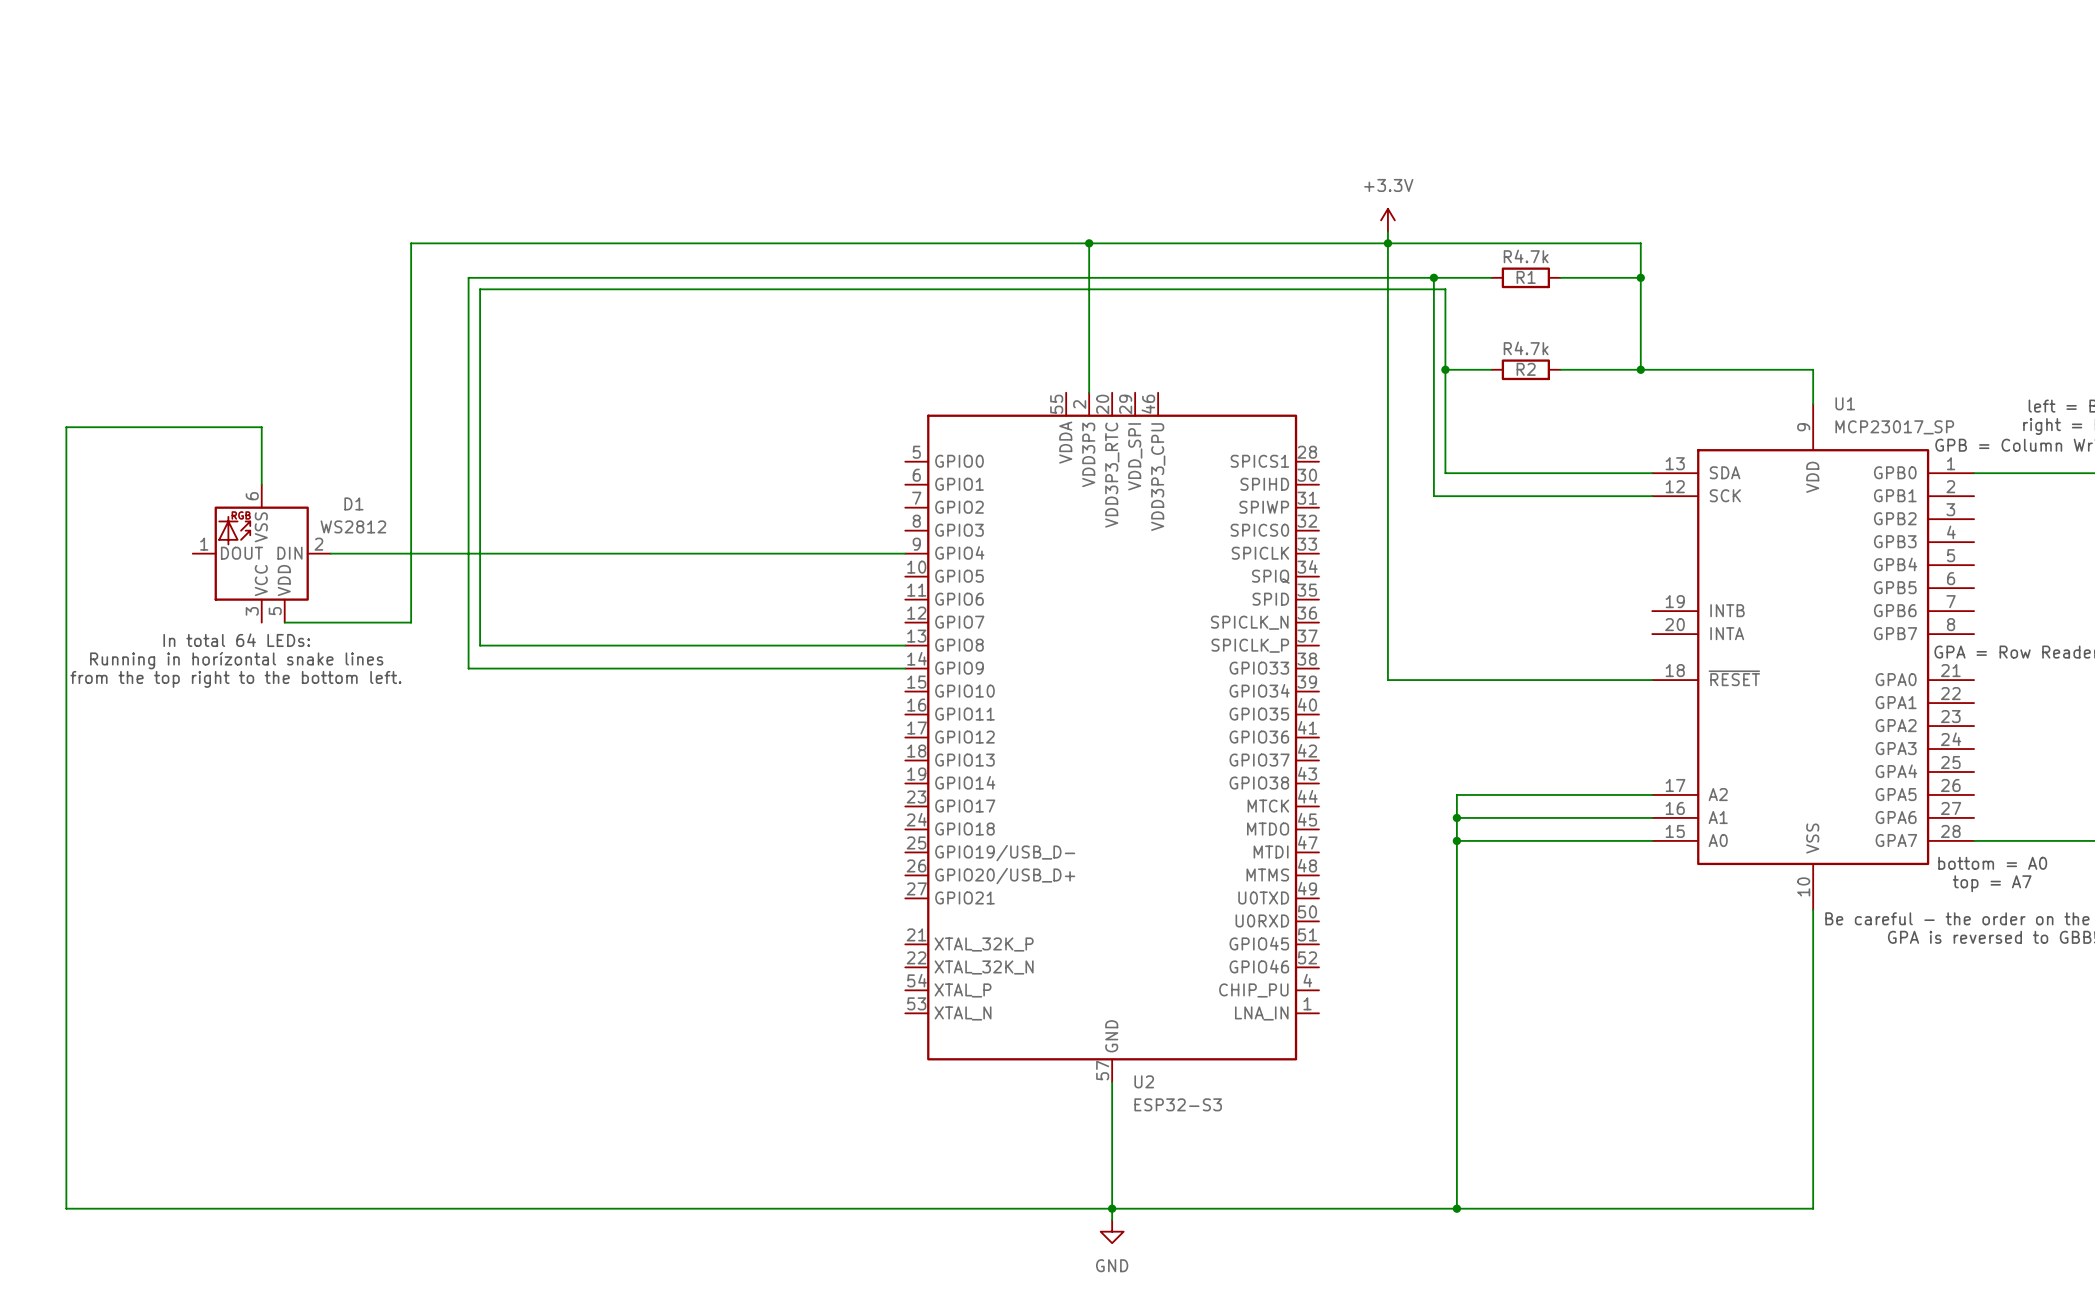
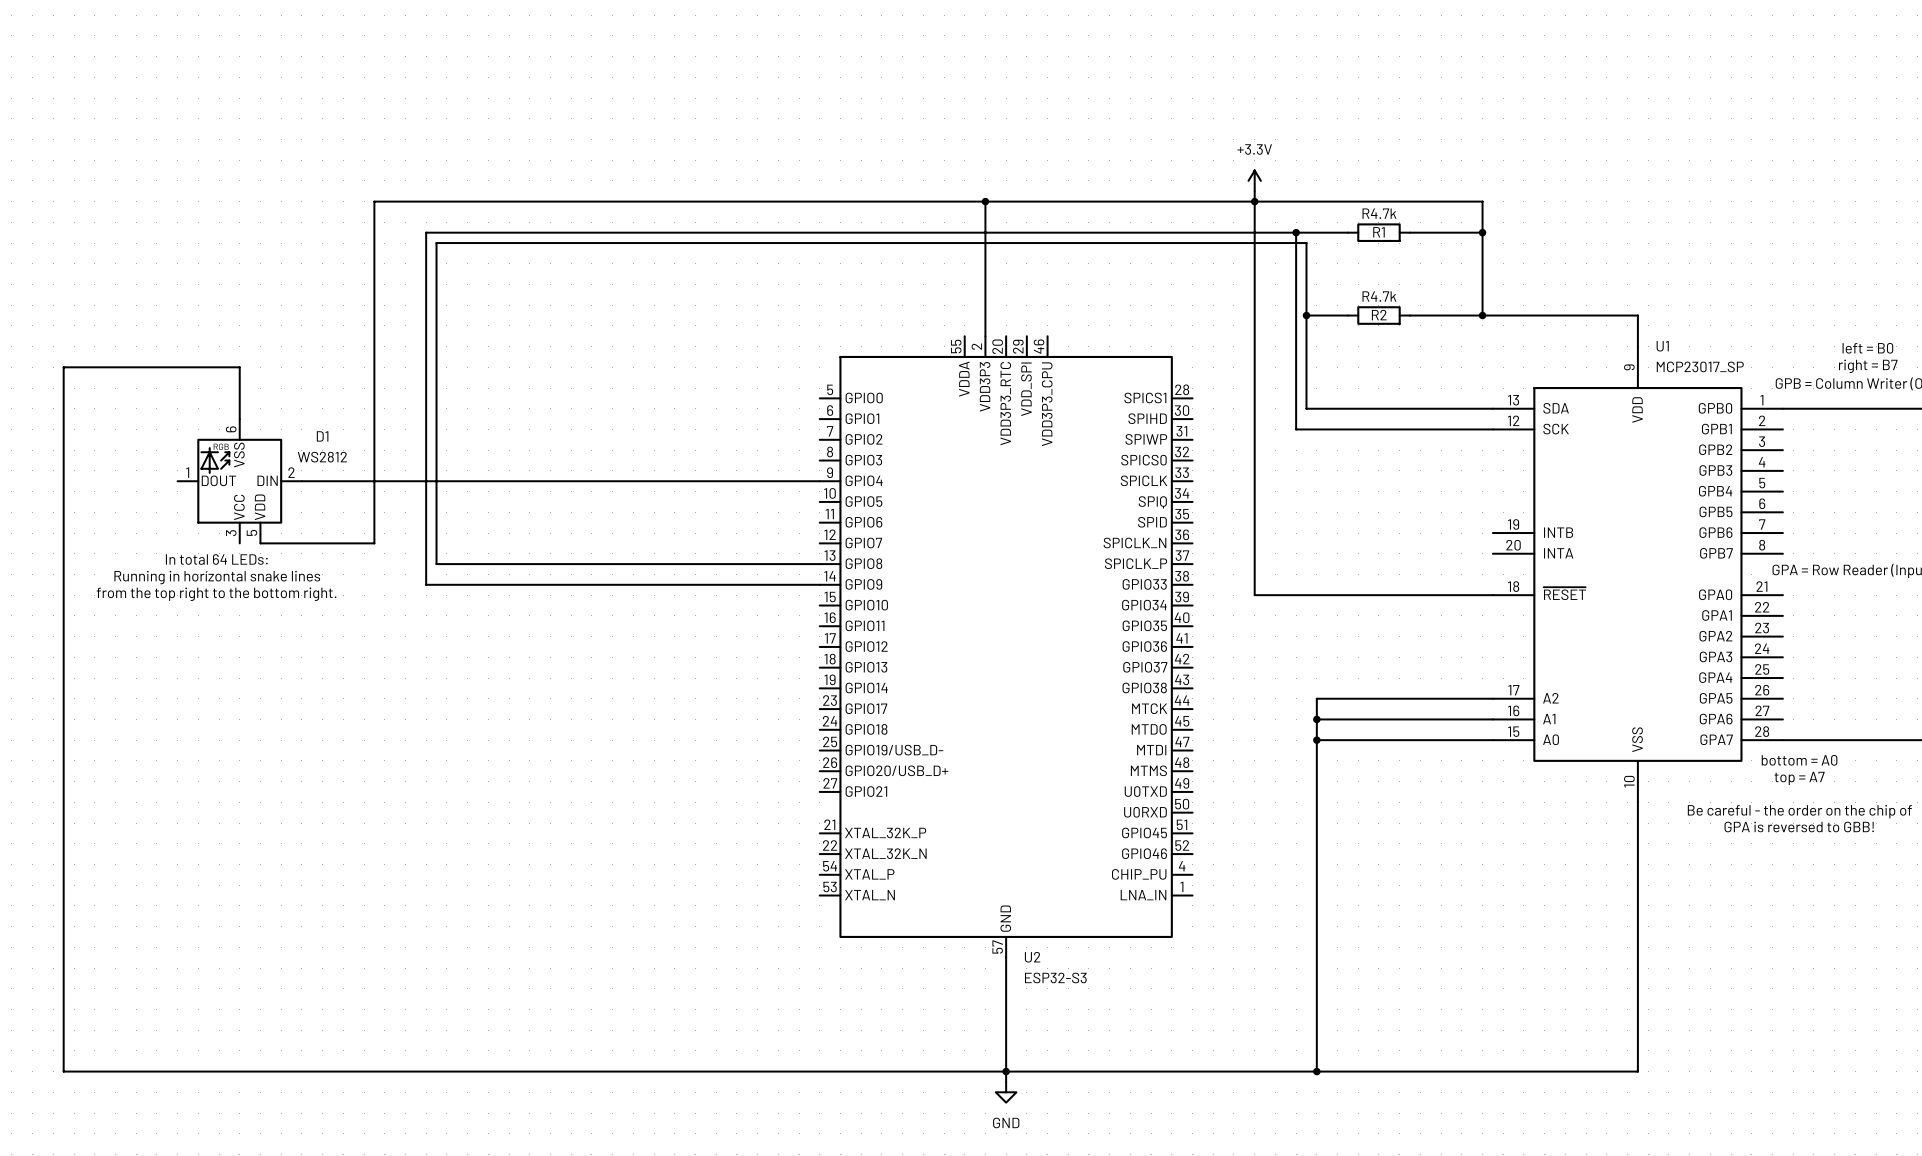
text: from the top right to the bottom left. (235, 679) -> from the top right to the bottom right. (216, 594)

